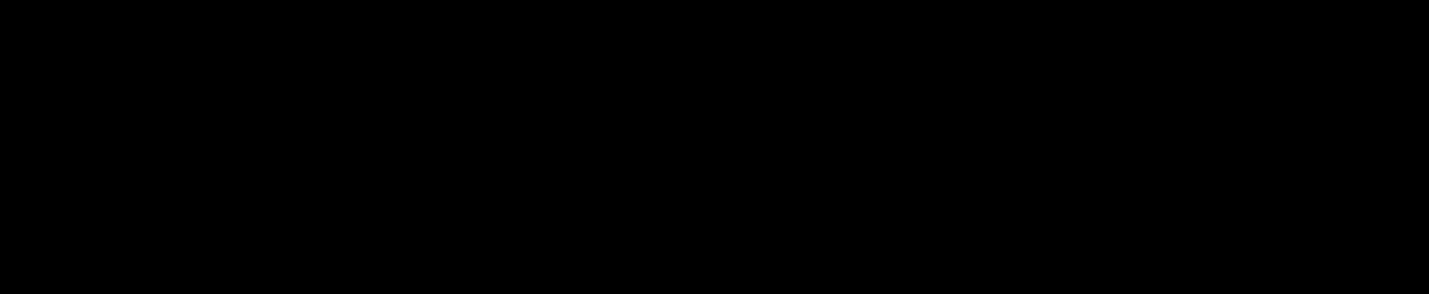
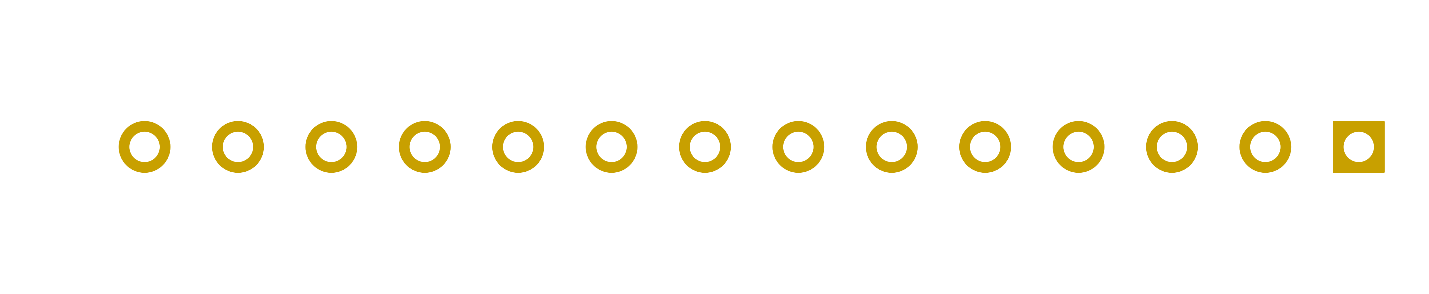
part: none -> (751, 146)

